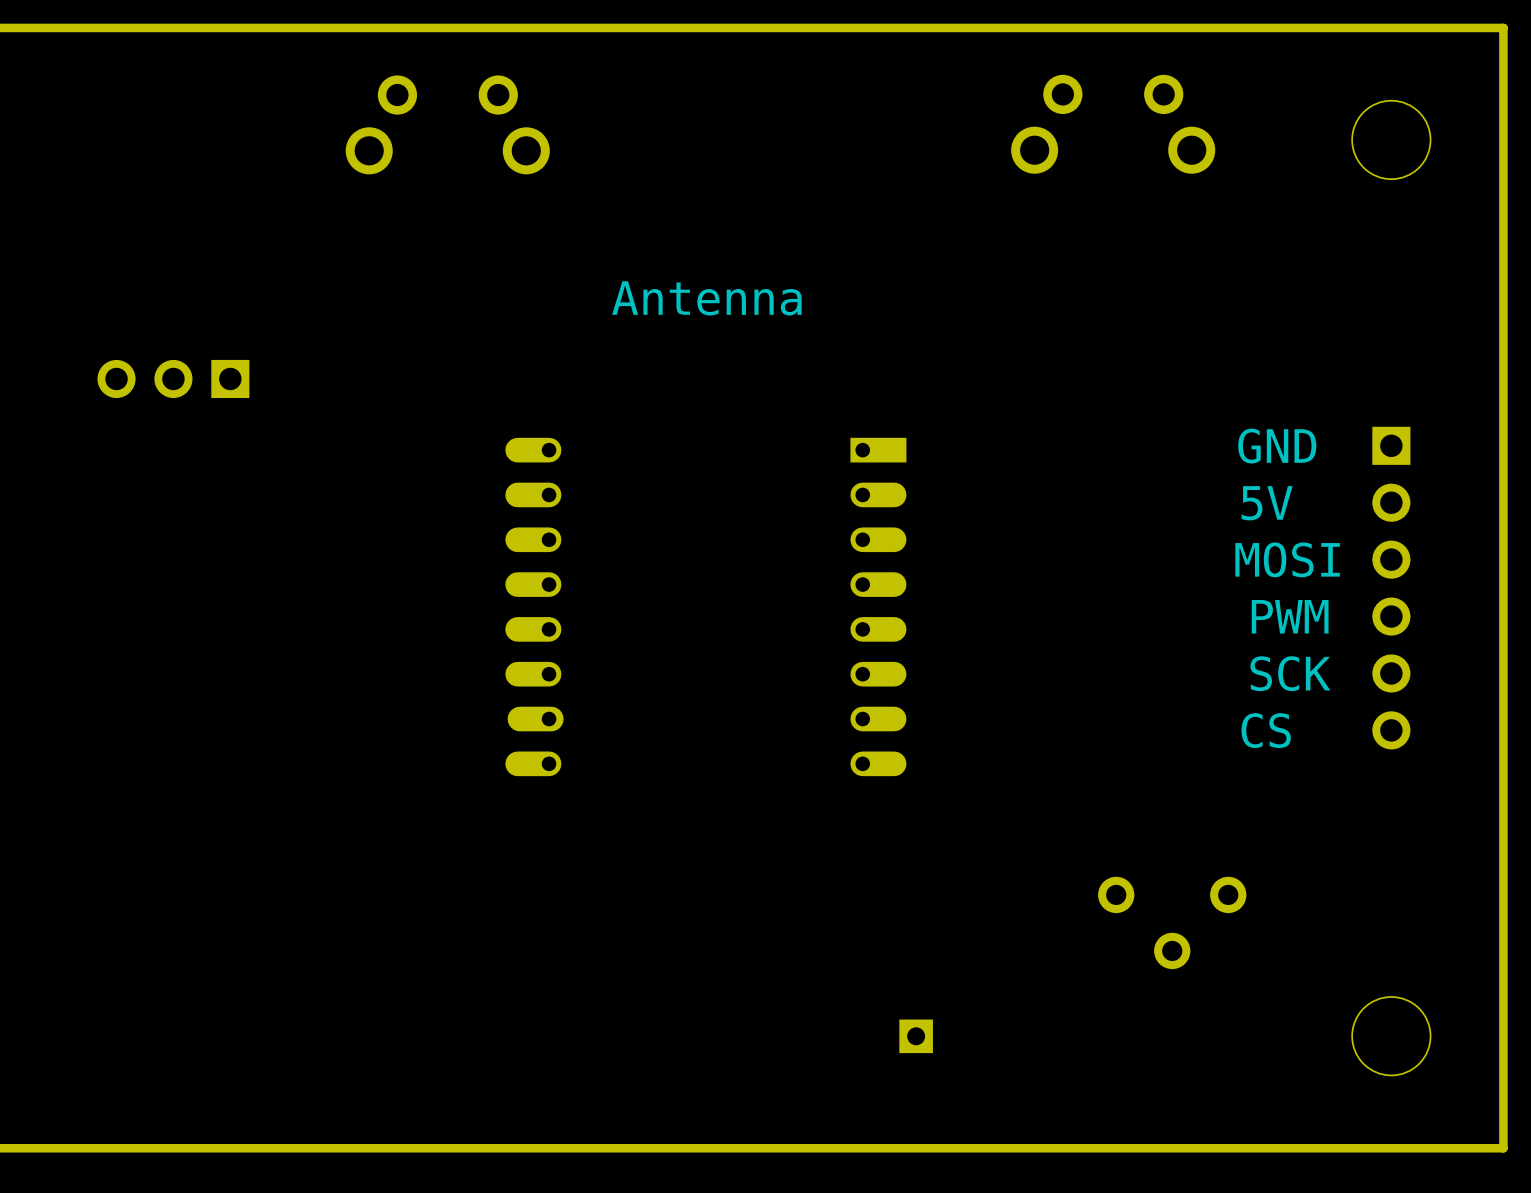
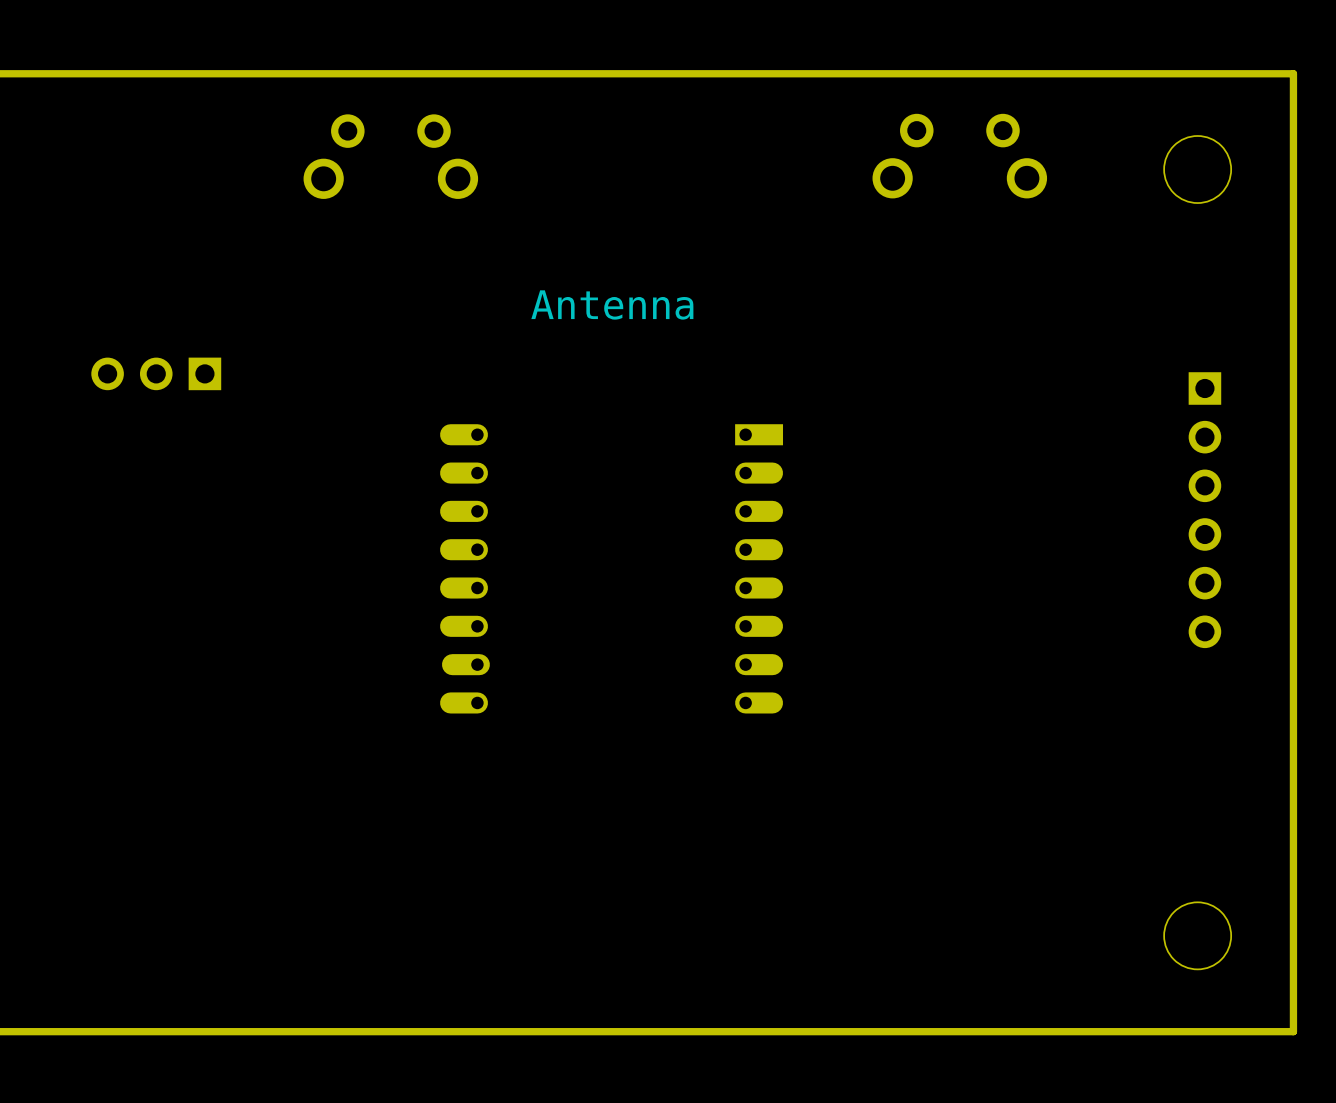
text: GND (1277, 446) -> none
text: 5V (1267, 503) -> none
text: MOSI (1287, 559) -> none
part position: (1391, 588) -> (1204, 510)
text: PWM (1290, 616) -> none
text: SCK (1290, 673) -> none
text: CS (1266, 730) -> none
part: (1172, 922) -> none
part: (916, 1036) -> none

